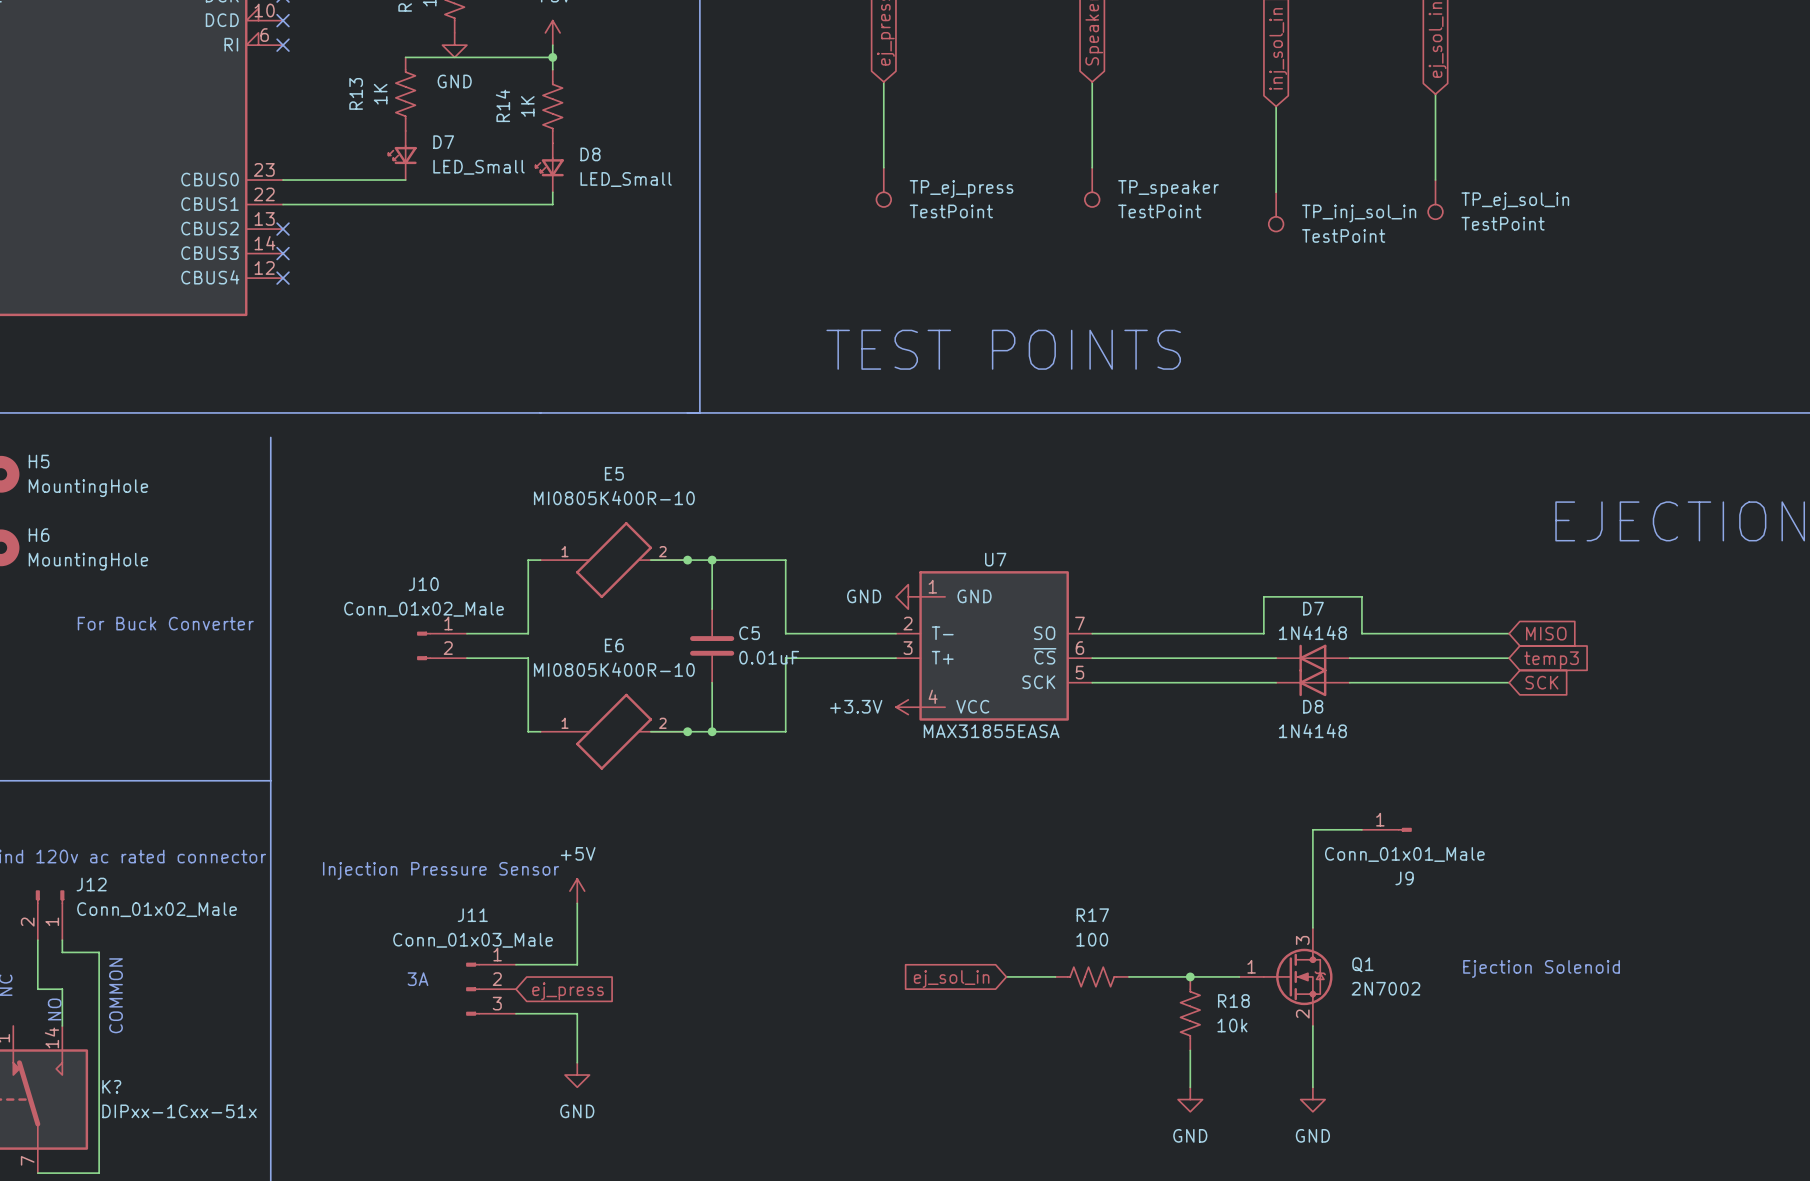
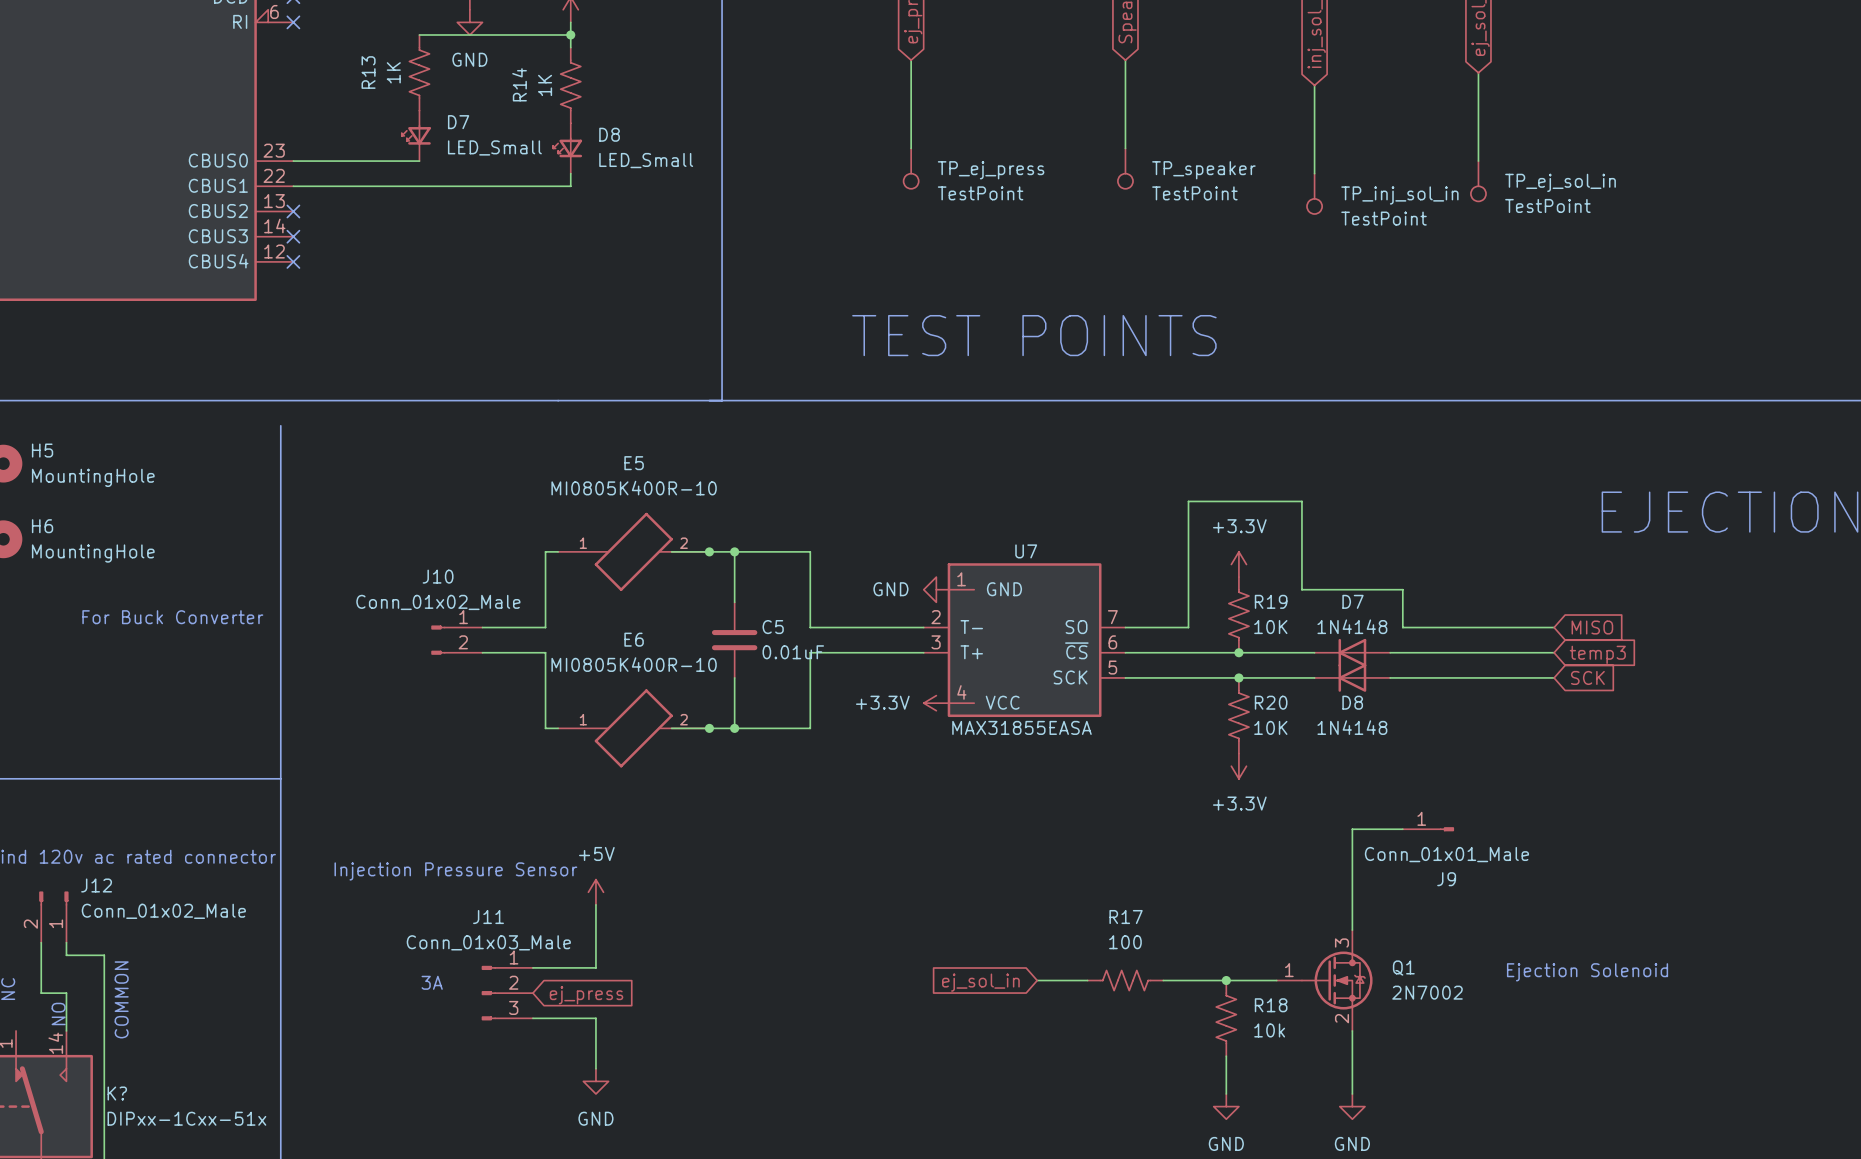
power symbol: none -> +3.3V (1238, 564)
wire: (1263, 596) (1263, 633) (1153, 633) -> (1301, 589) (1301, 501) (1188, 501) (1188, 627)
R19: none -> 10K (1238, 614)
junction: none -> (1238, 652)
junction: none -> (1238, 677)
R20: none -> 10K (1238, 715)
power symbol: none -> +3.3V (1238, 766)

